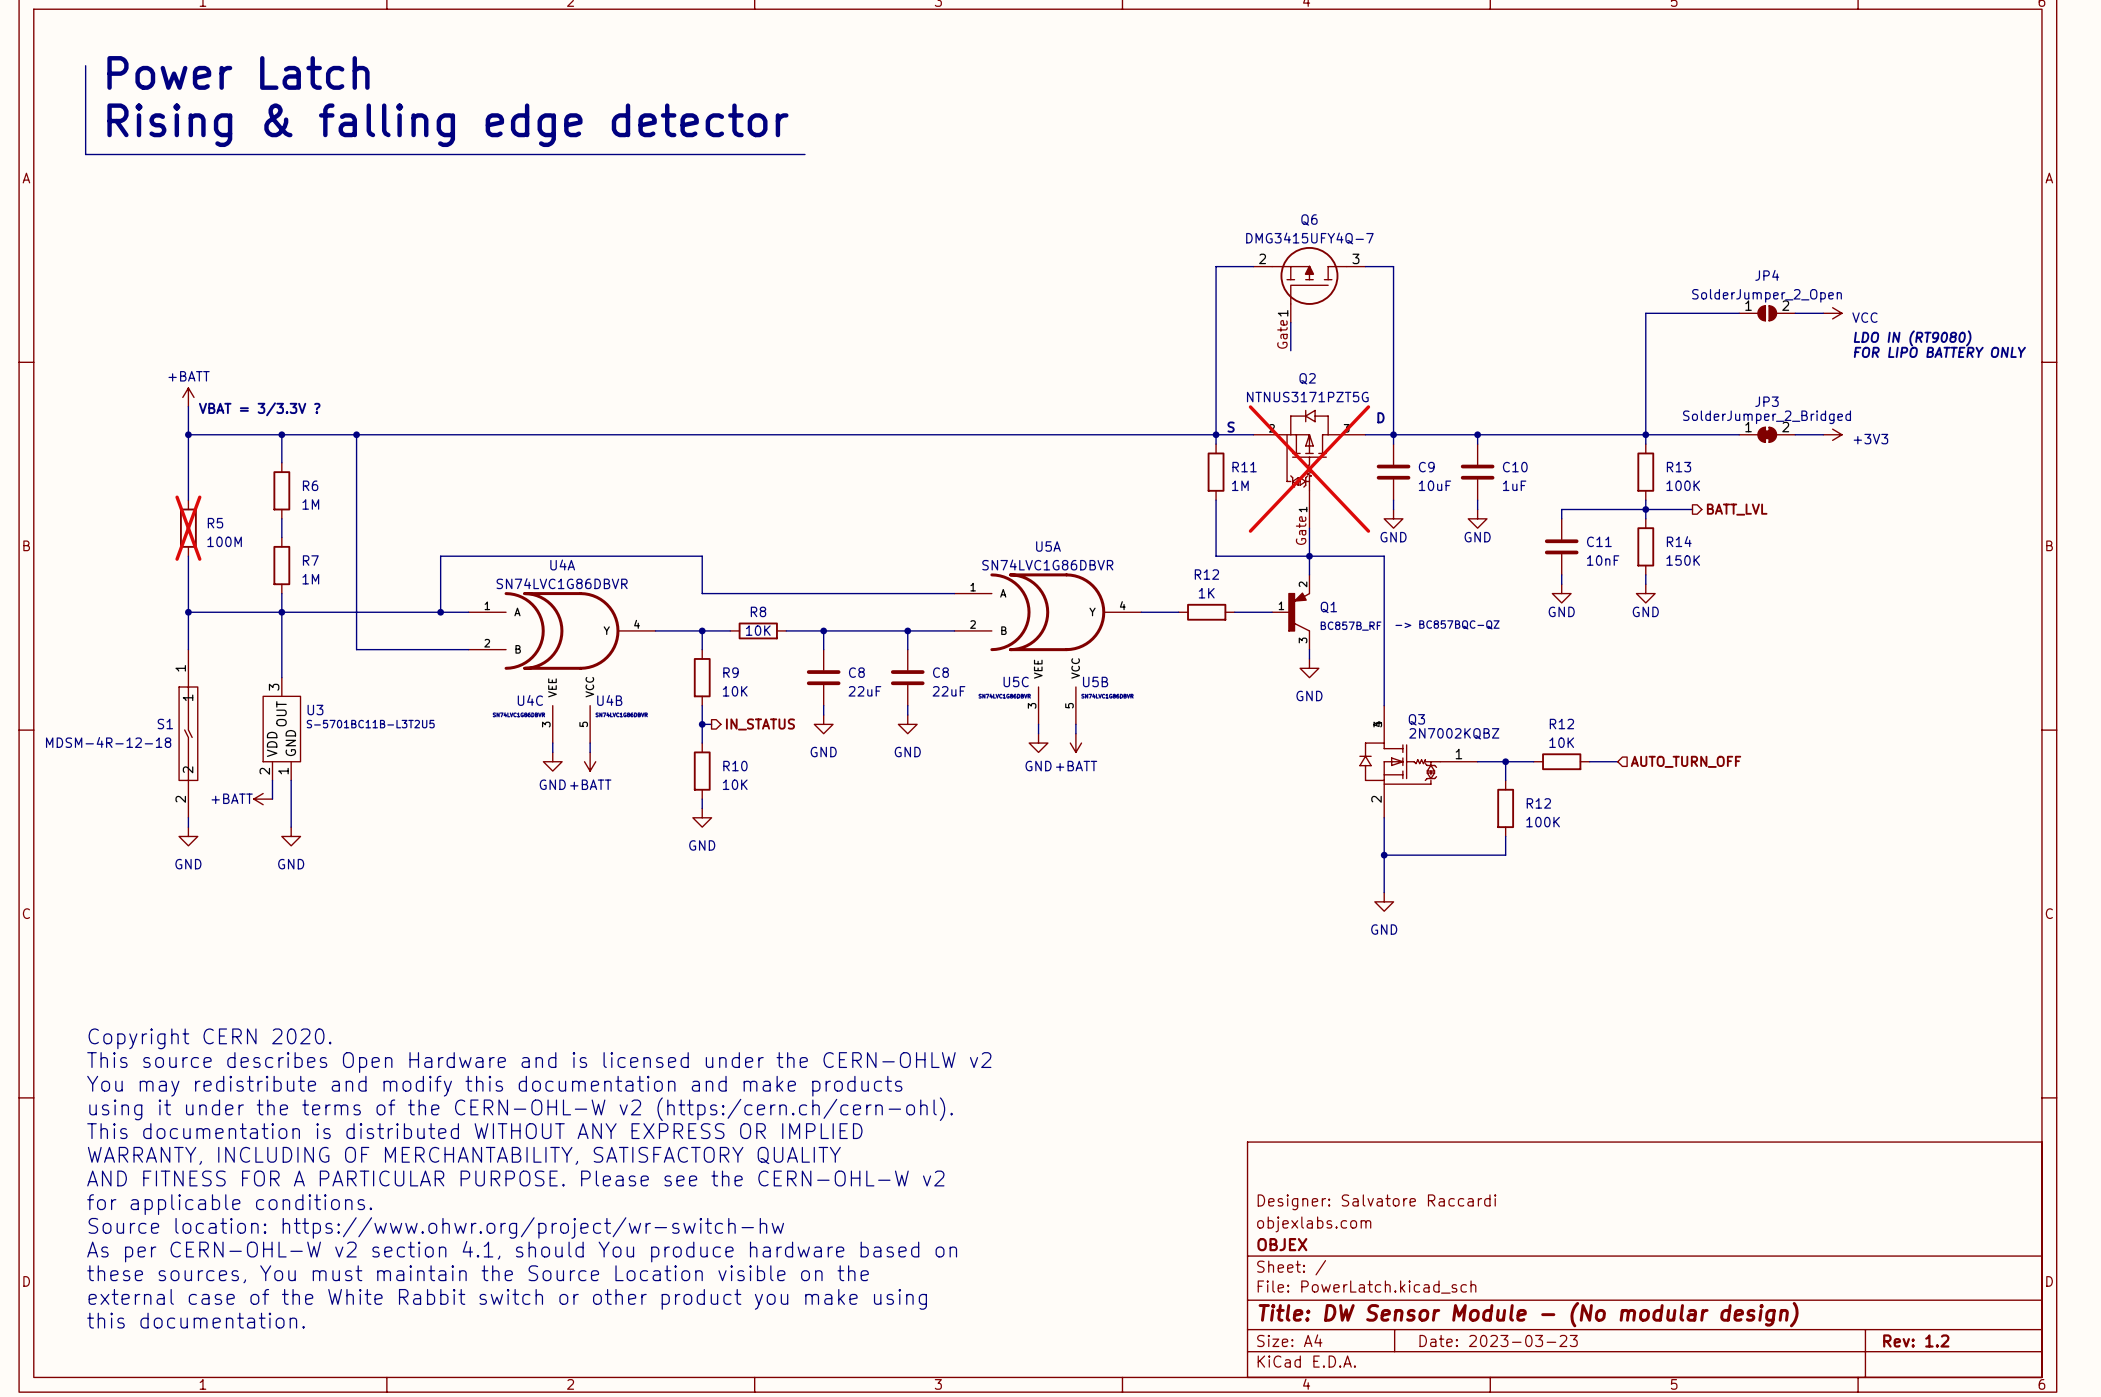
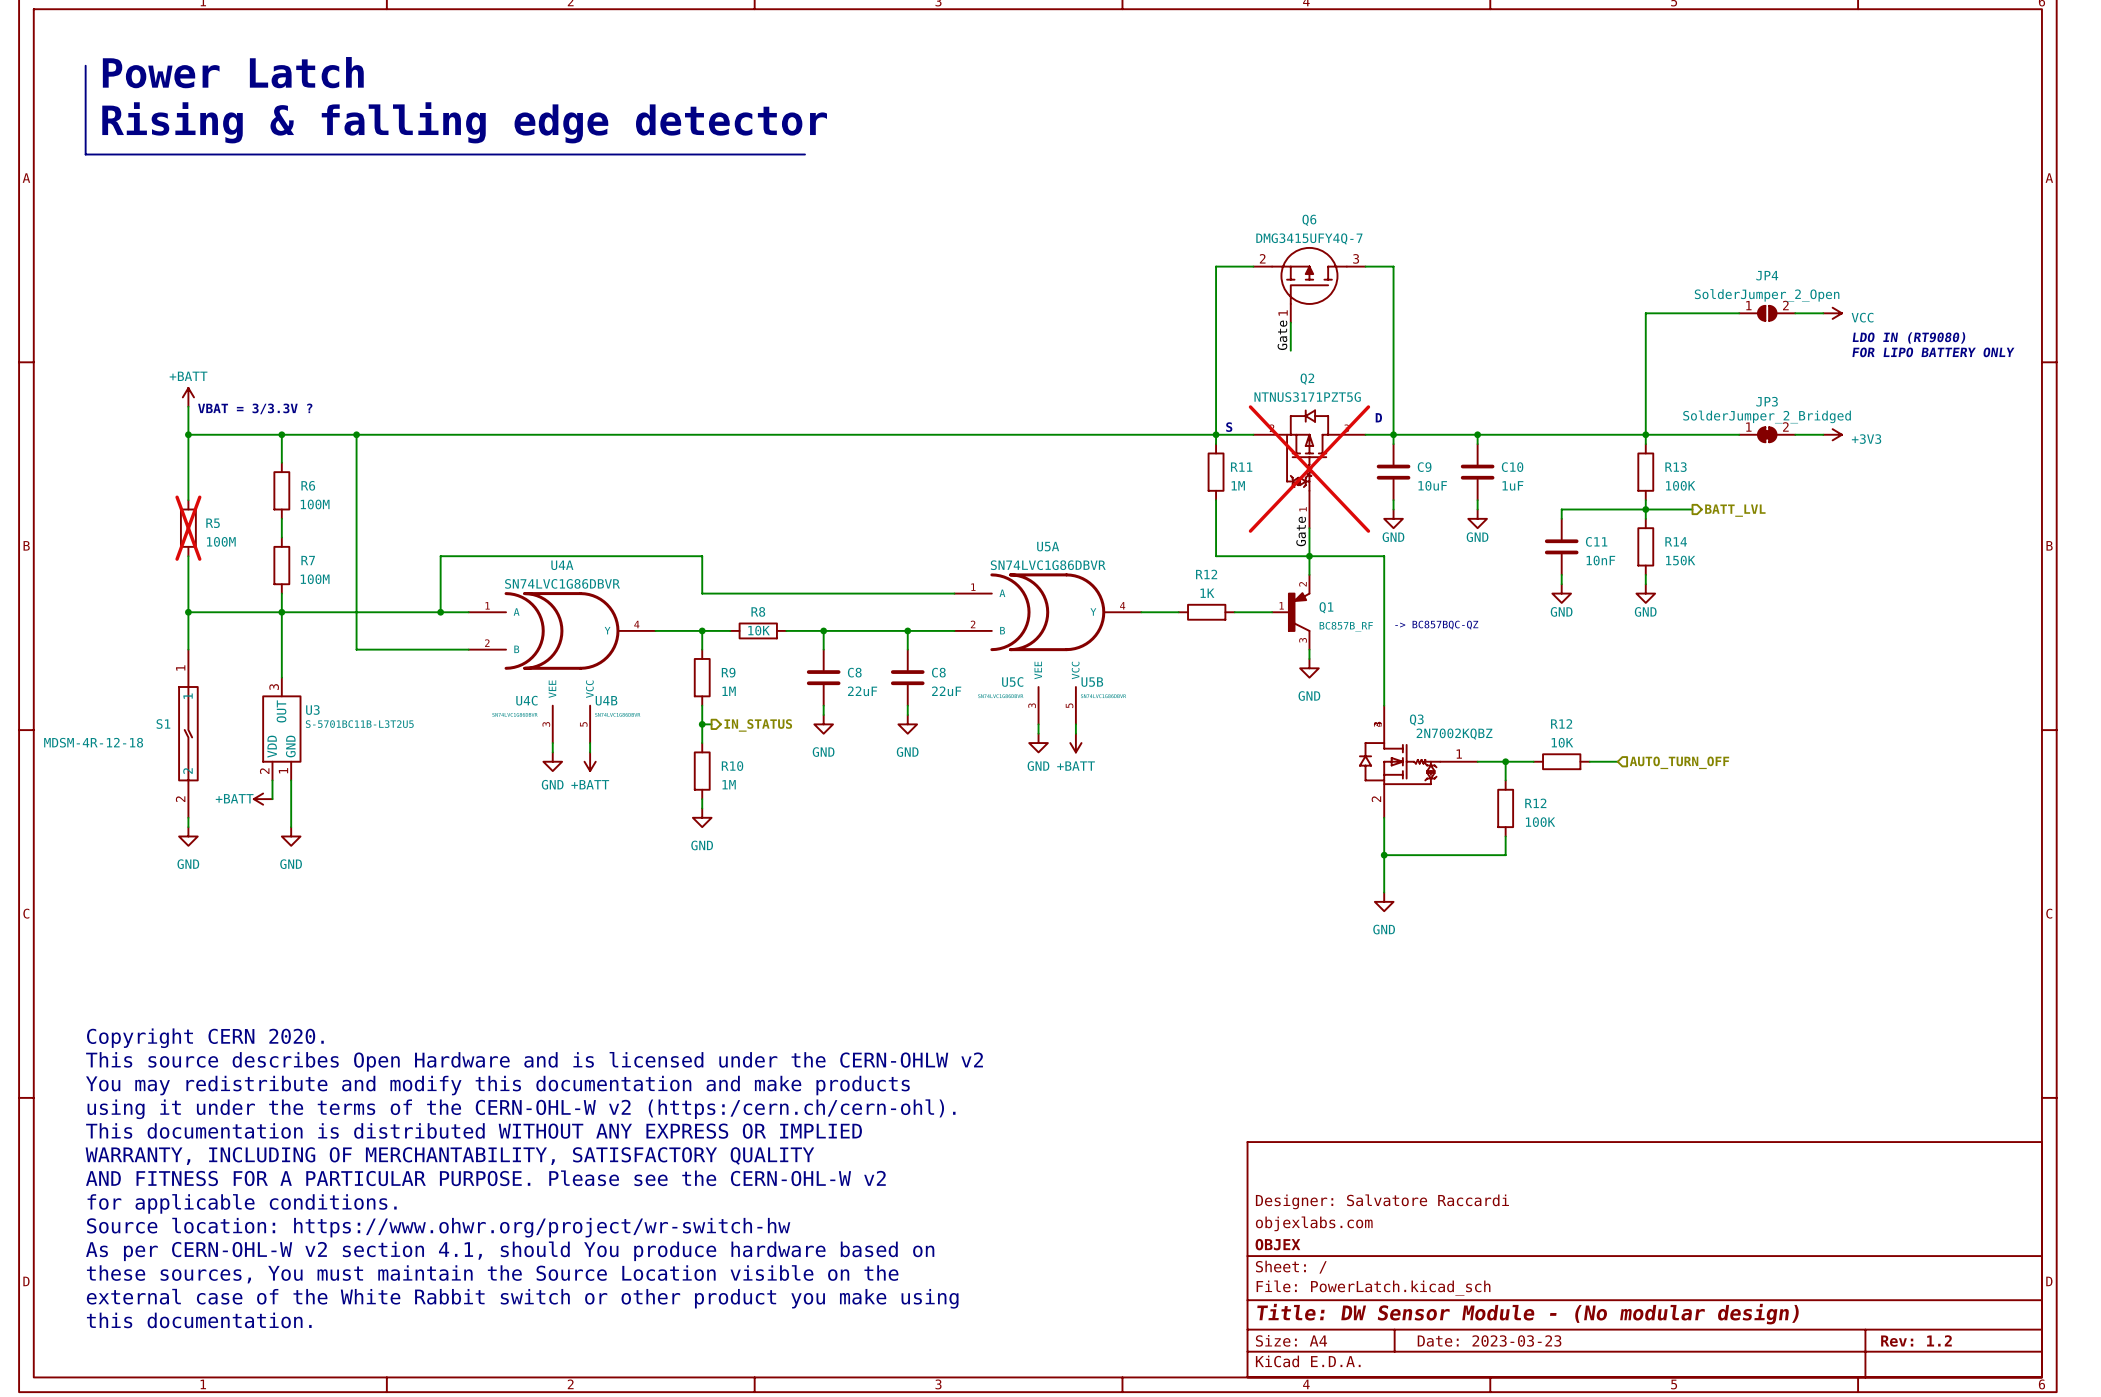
R6 value: 1M (310, 504) -> 100M (315, 504)
R7 value: 1M (310, 579) -> 100M (315, 579)
R9 value: 10K (735, 691) -> 1M (729, 691)
R10 value: 10K (735, 784) -> 1M (729, 784)

